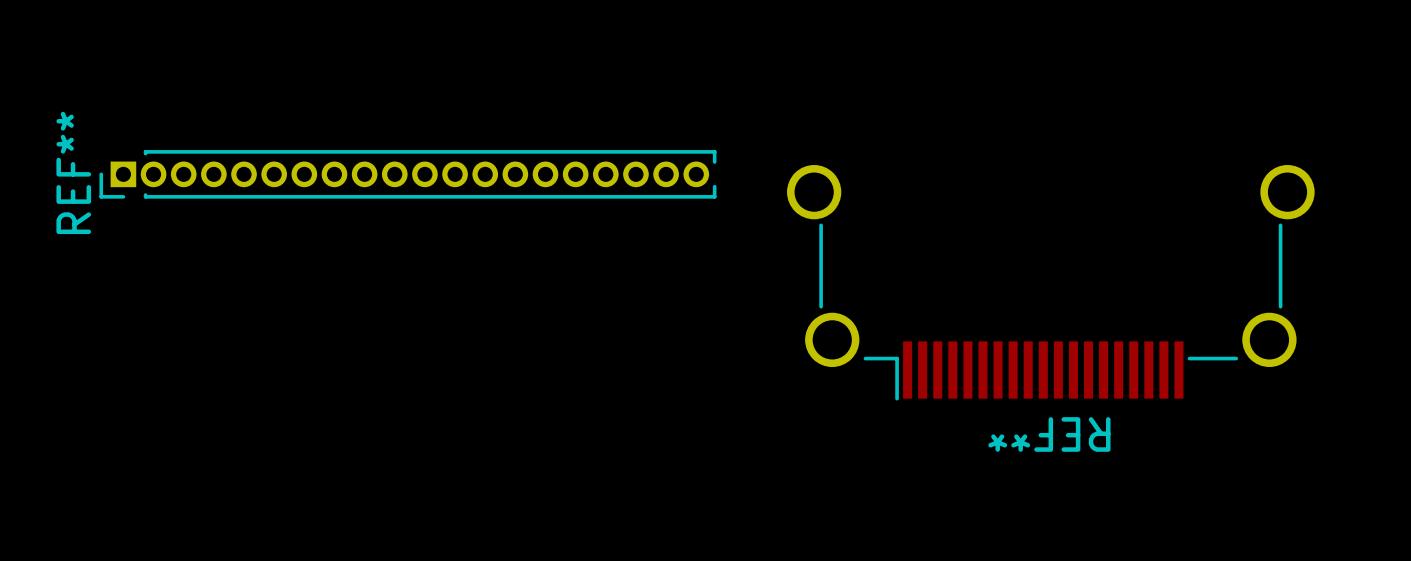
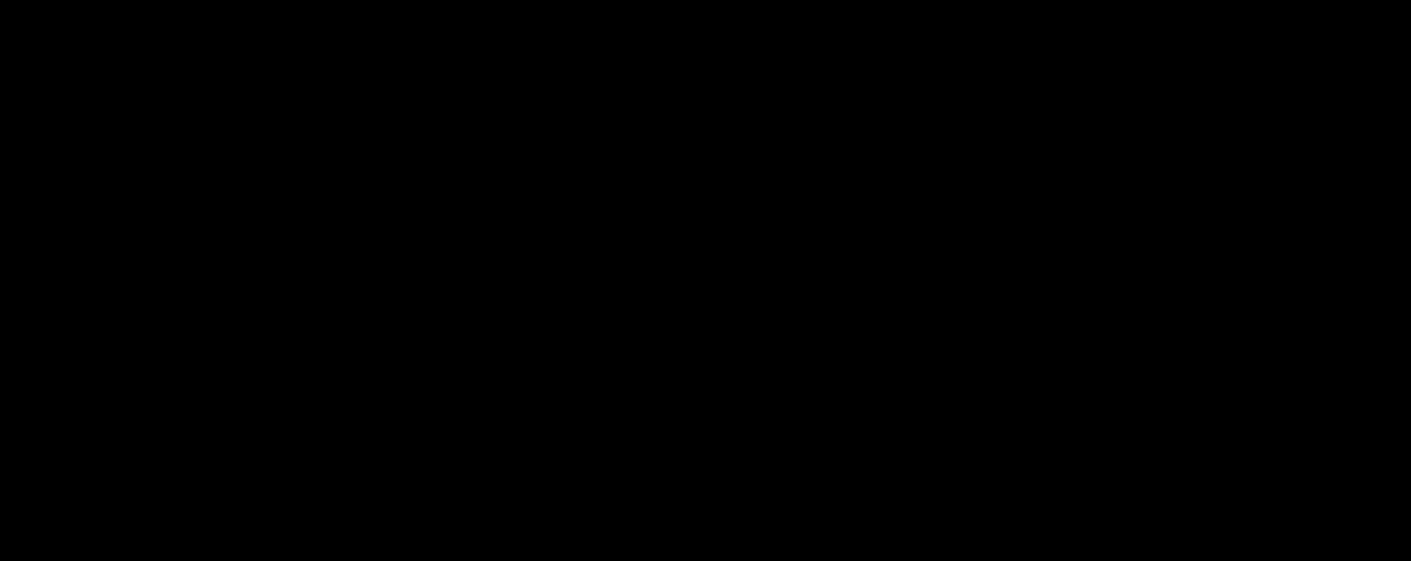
REF**: (407, 174) -> none
REF**: (1050, 282) -> none

